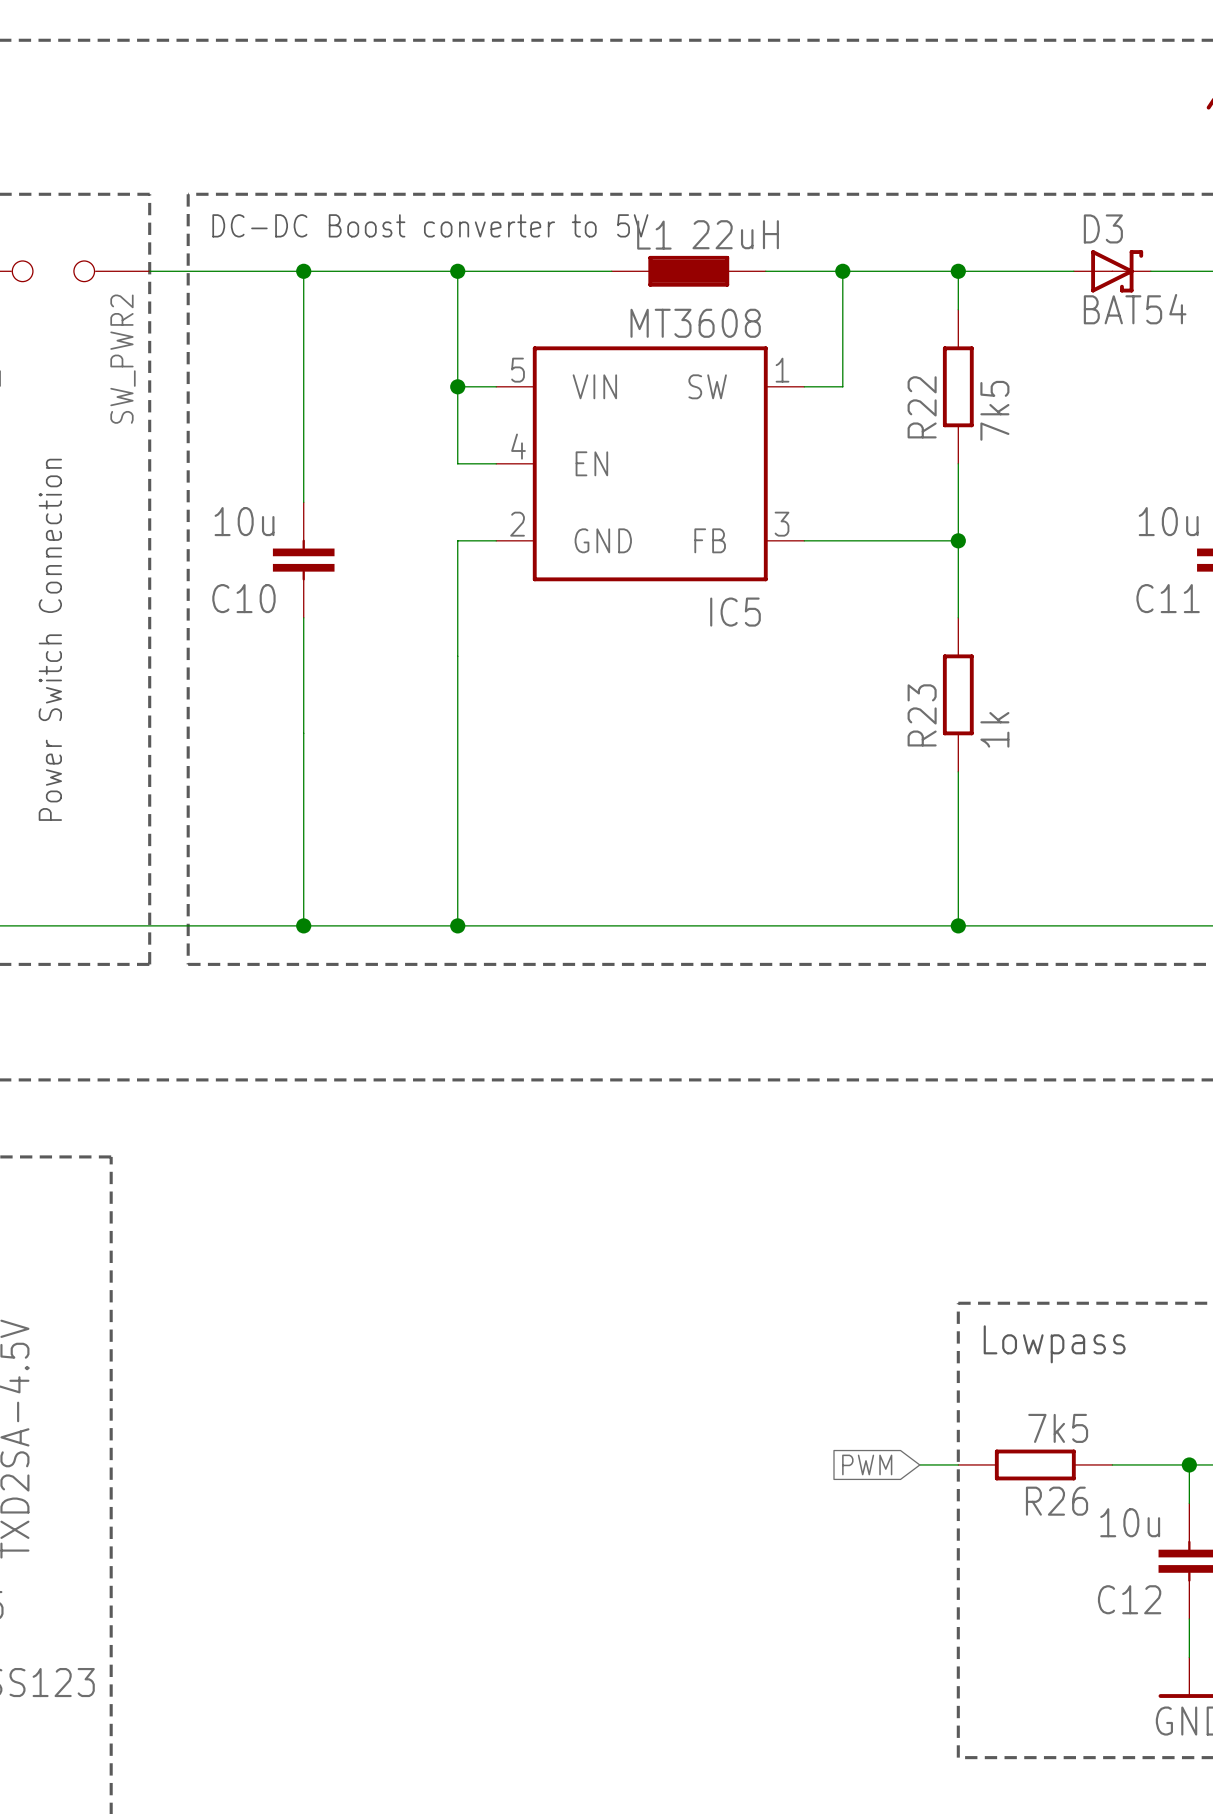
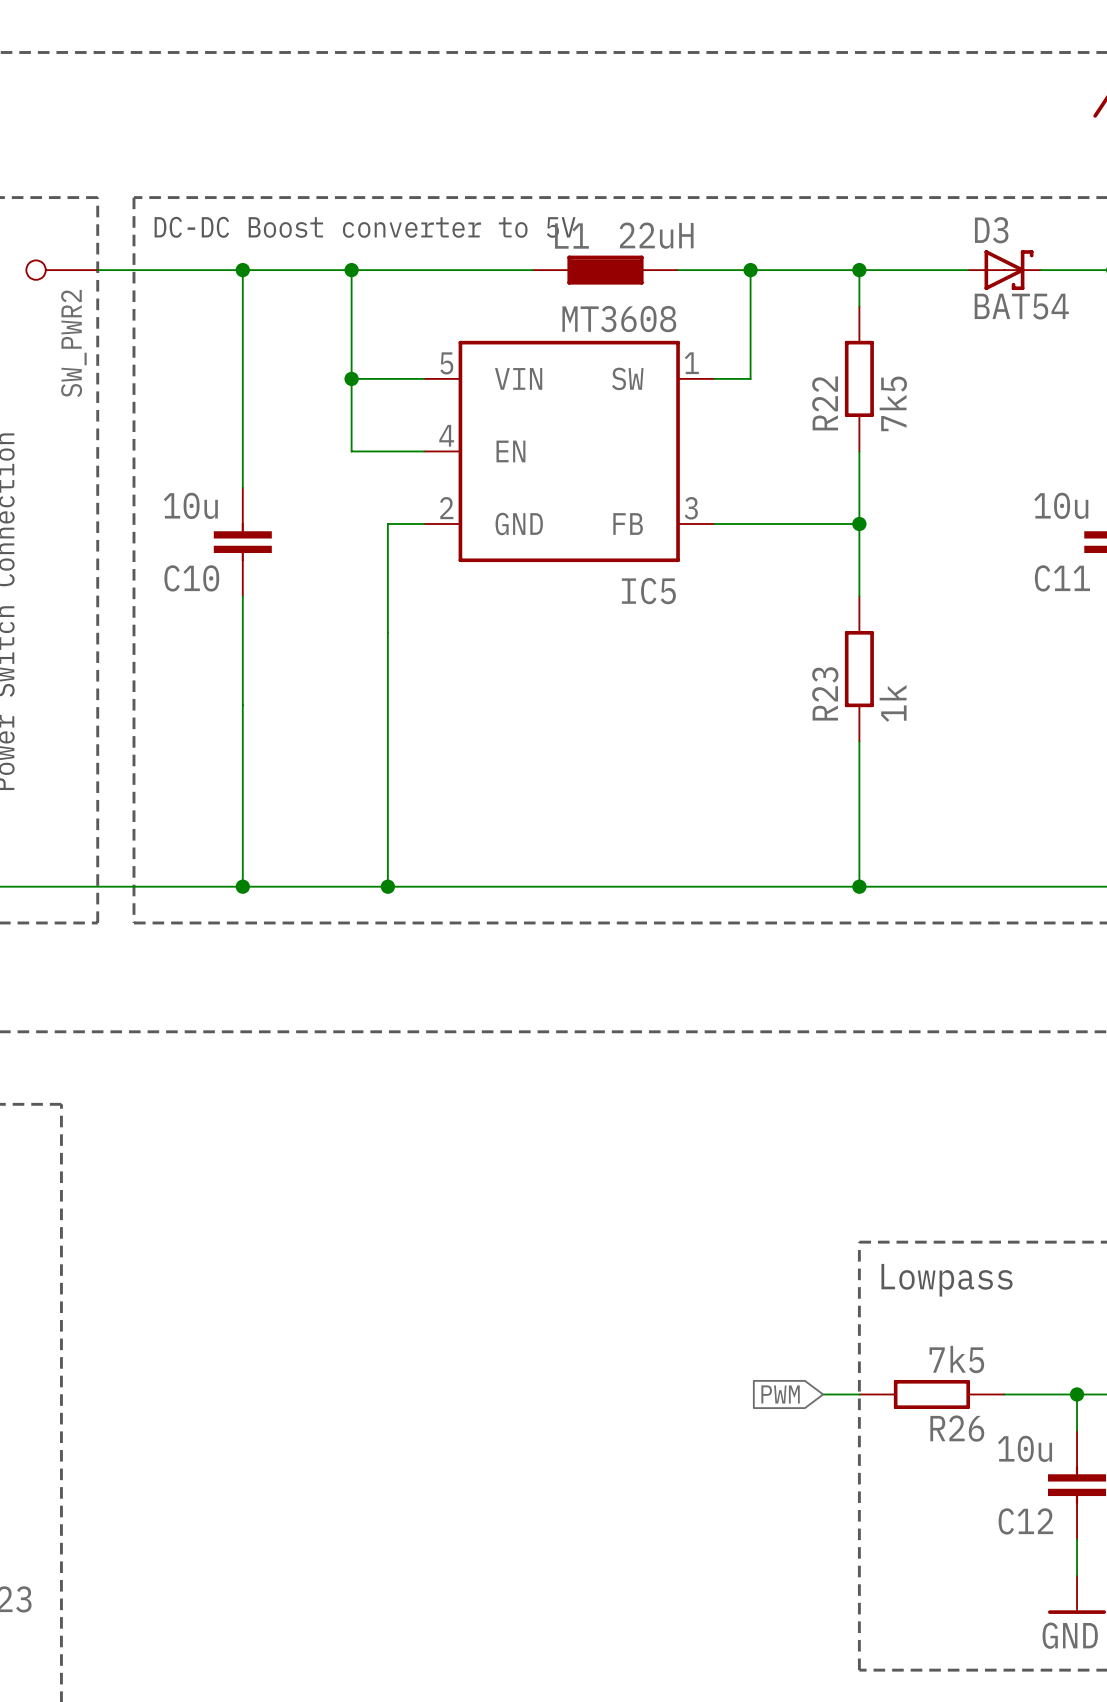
wire: (457, 271) (457, 463) -> (351, 270) (351, 451) (387, 451)
junction position: (457, 271) -> (351, 270)
wire: none -> (351, 378) (387, 378)
junction position: (457, 386) -> (351, 378)

